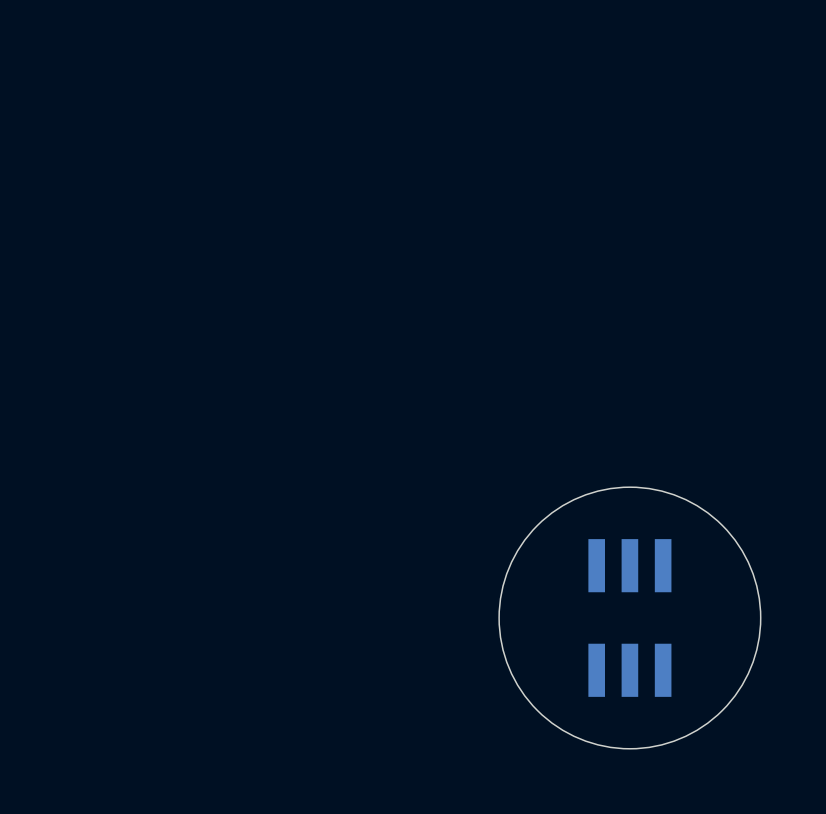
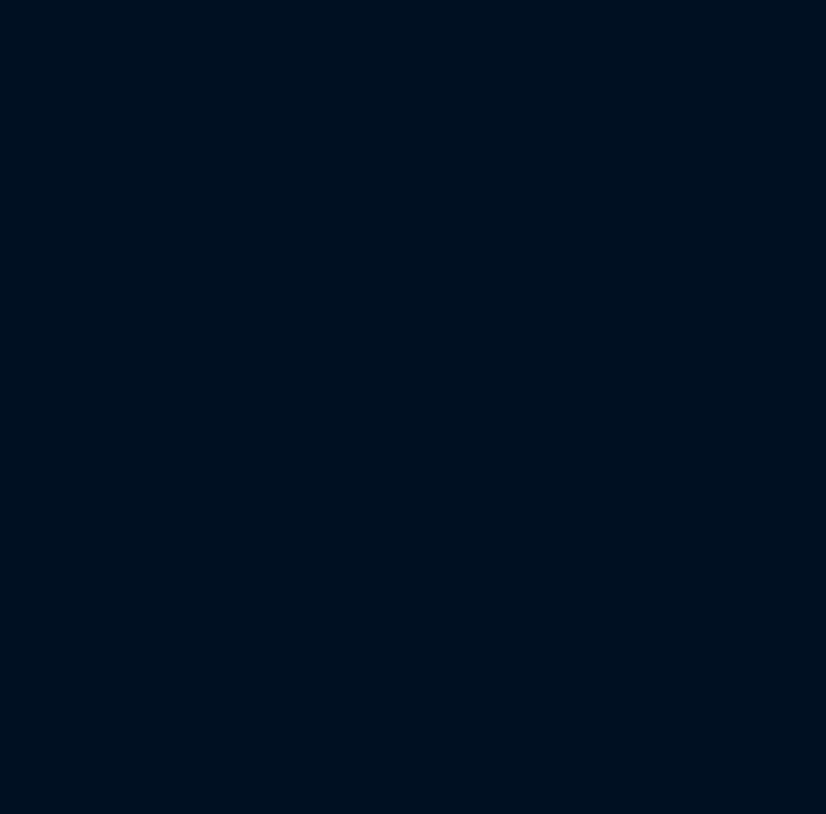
part: (629, 617) -> none

